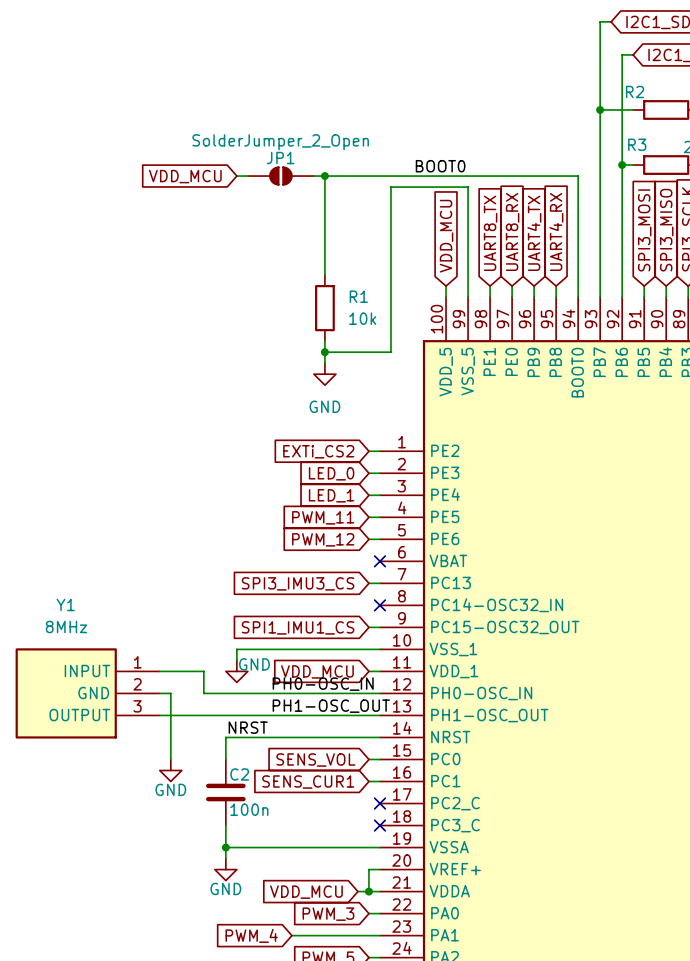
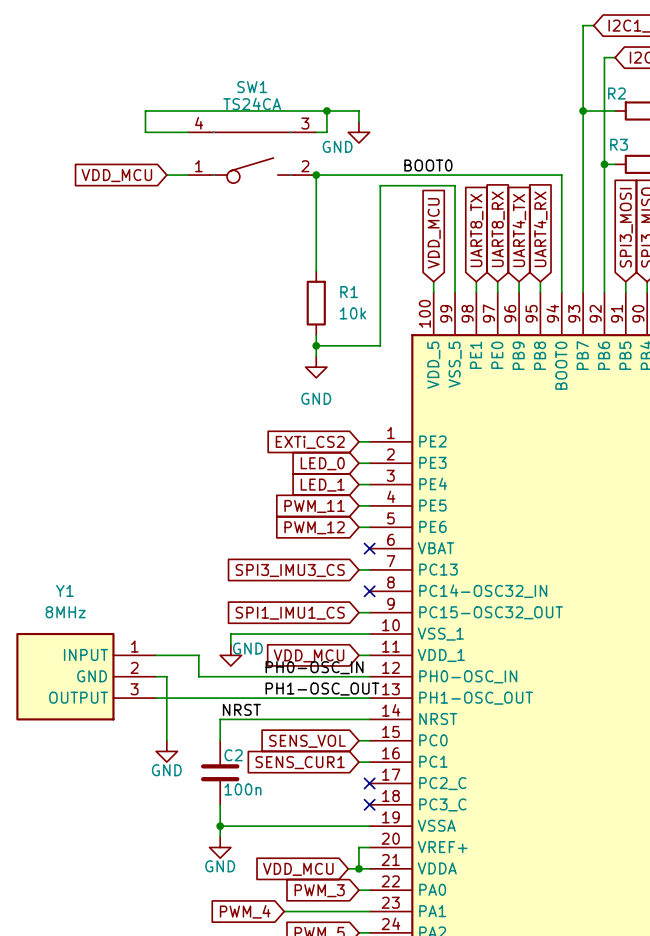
wire: none -> (326, 111) (326, 132) (316, 132)
junction: none -> (326, 111)
wire: none -> (358, 121) (358, 111) (145, 111) (145, 132) (188, 132)
power symbol: none -> GND (358, 132)
SW1: none -> TS24CA (252, 157)
wire: none -> (166, 175) (188, 175)
global label position: VDD_MCU (185, 176) -> VDD_MCU (116, 175)
wire: (236, 176) (247, 176) -> none
JP1: SolderJumper_2_Open (280, 176) -> none

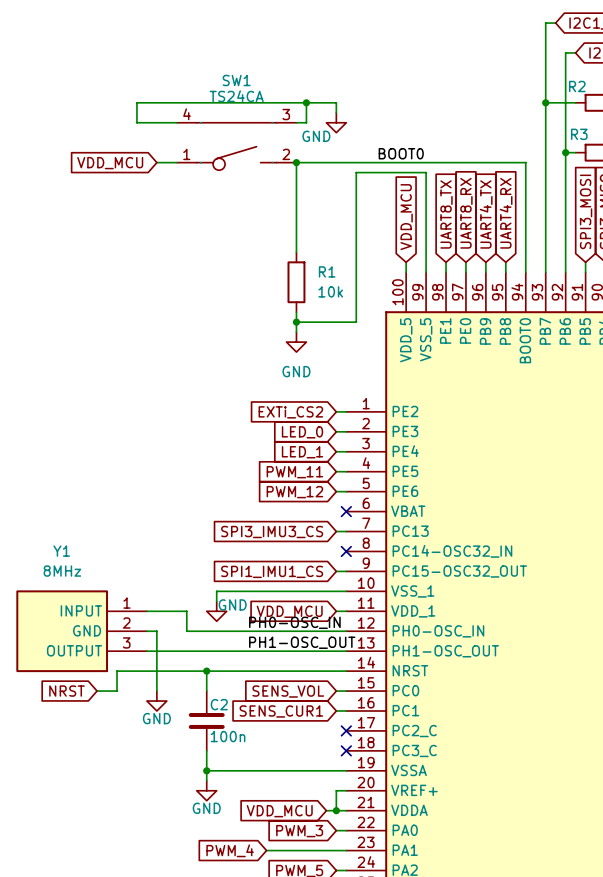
label: NRST (241, 709) -> none
wire: none -> (206, 671) (117, 671) (117, 691) (97, 691)
junction: none -> (206, 671)
global label: none -> NRST (67, 691)

